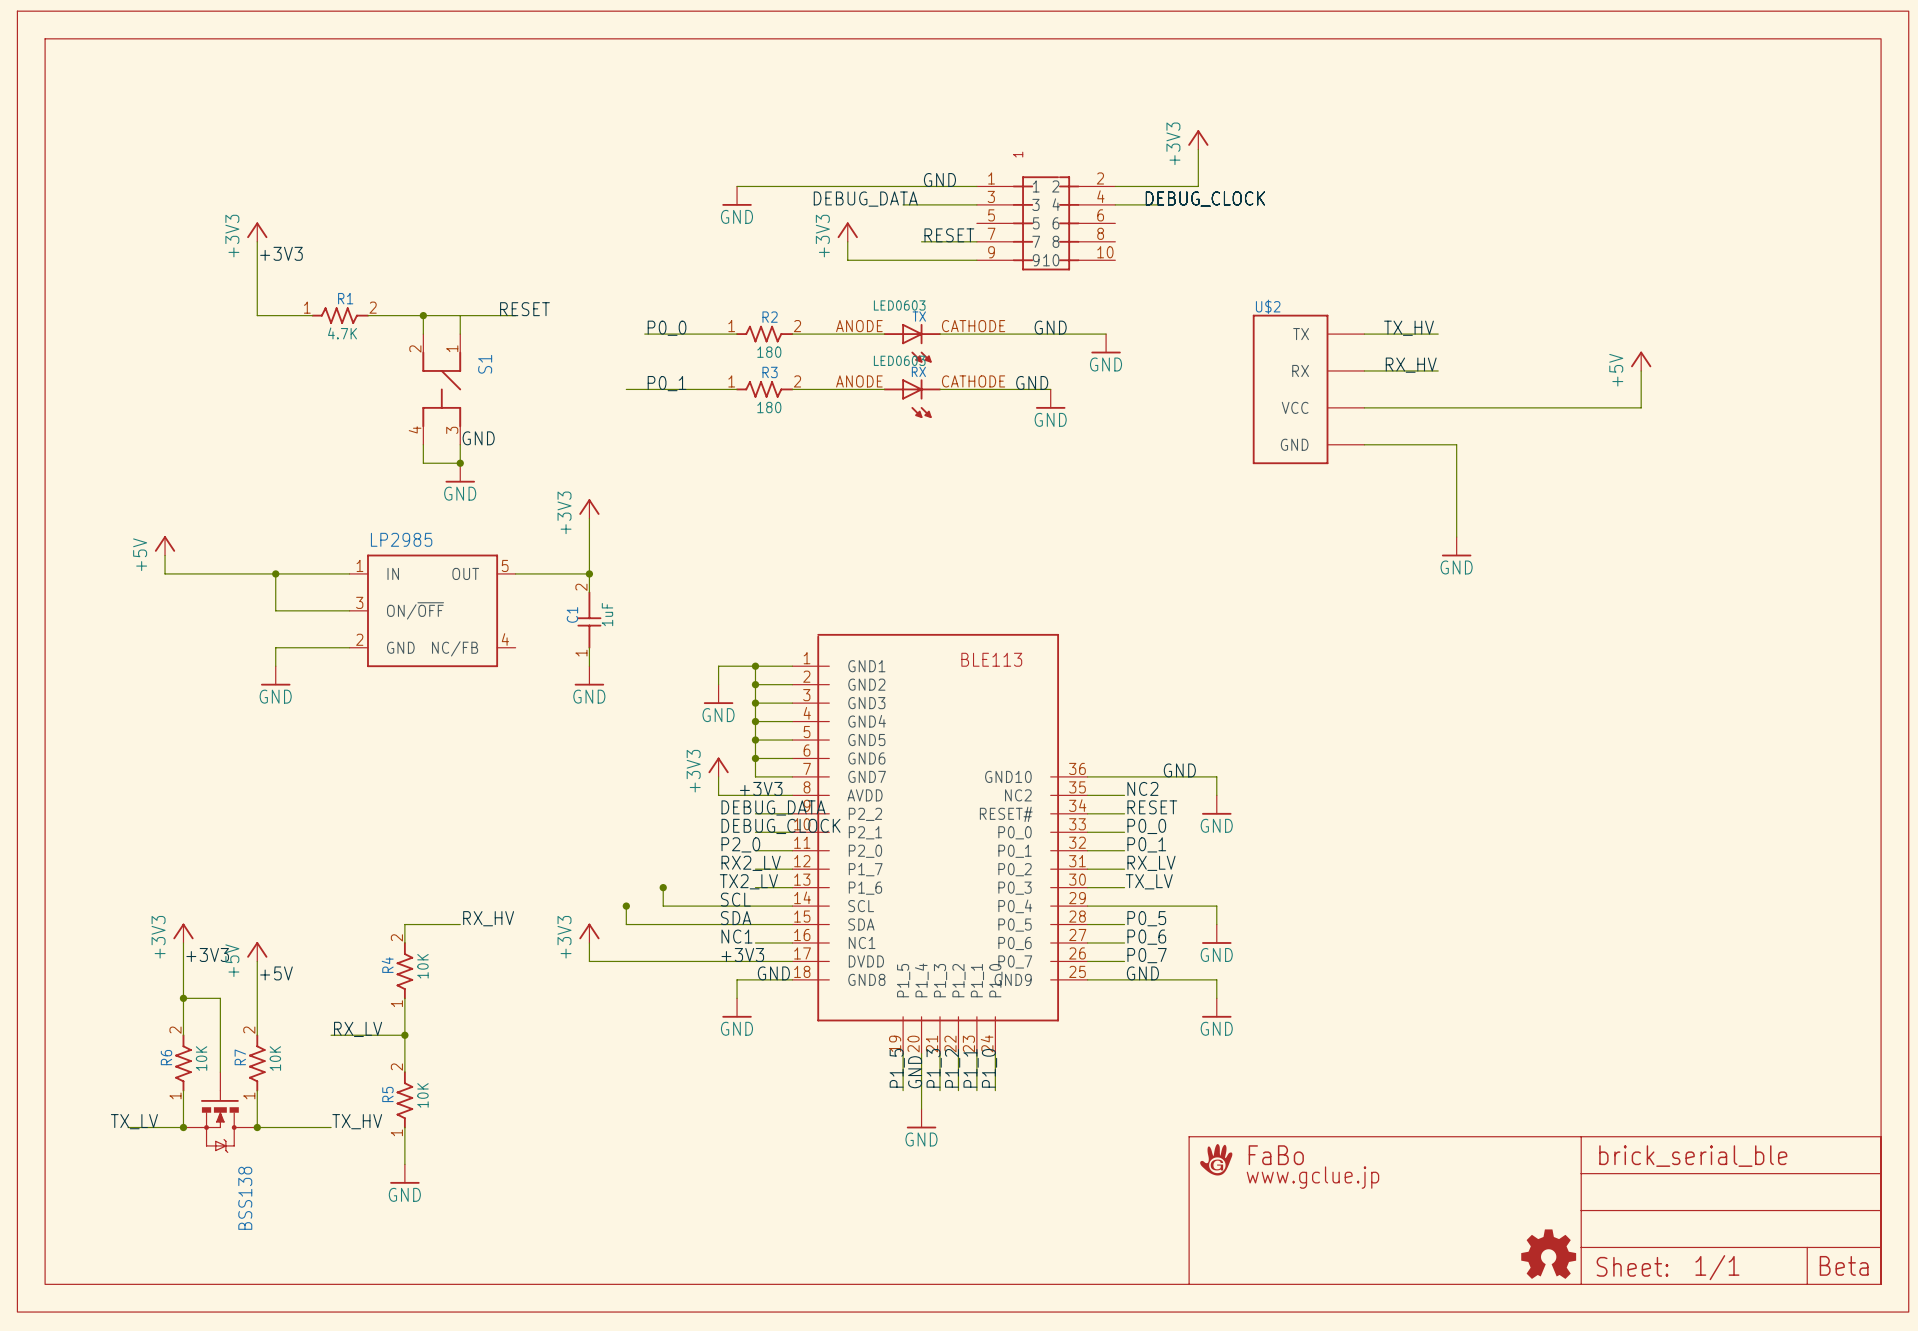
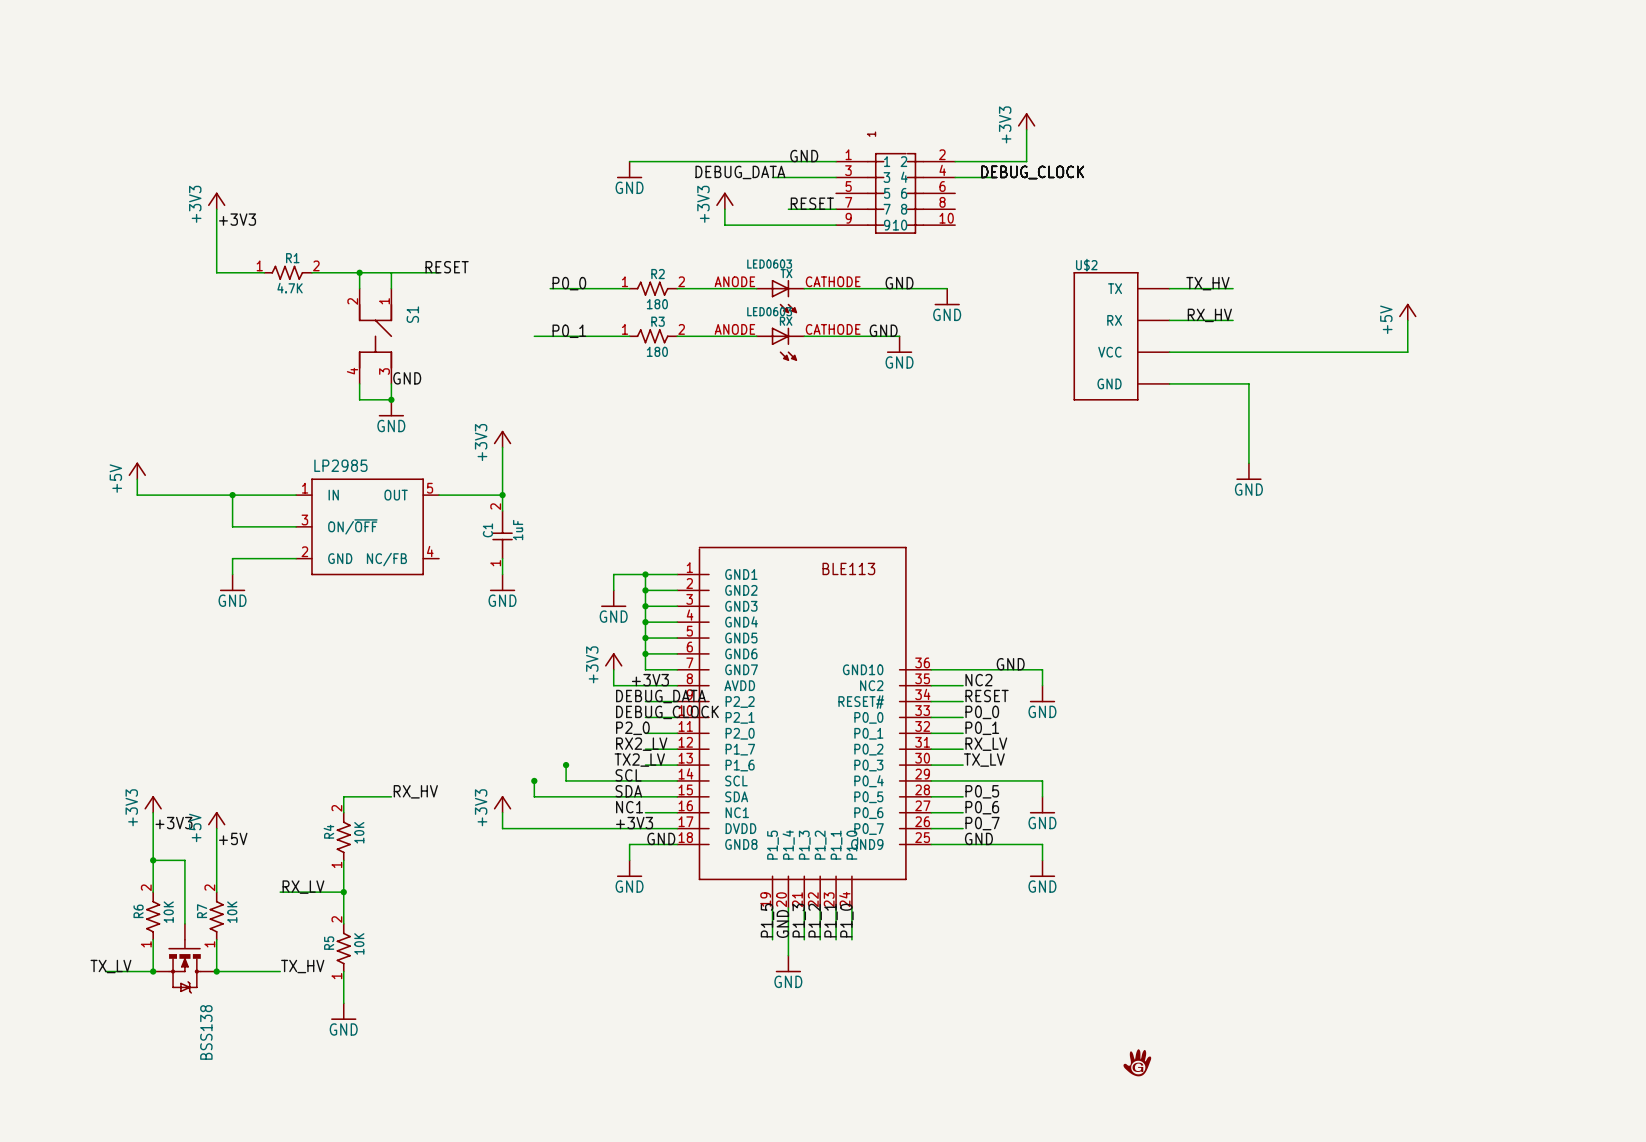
part: (963, 661) -> none
part: none -> (1137, 1062)
part: (1548, 1254) -> none
text: Beta (1844, 1265) -> none

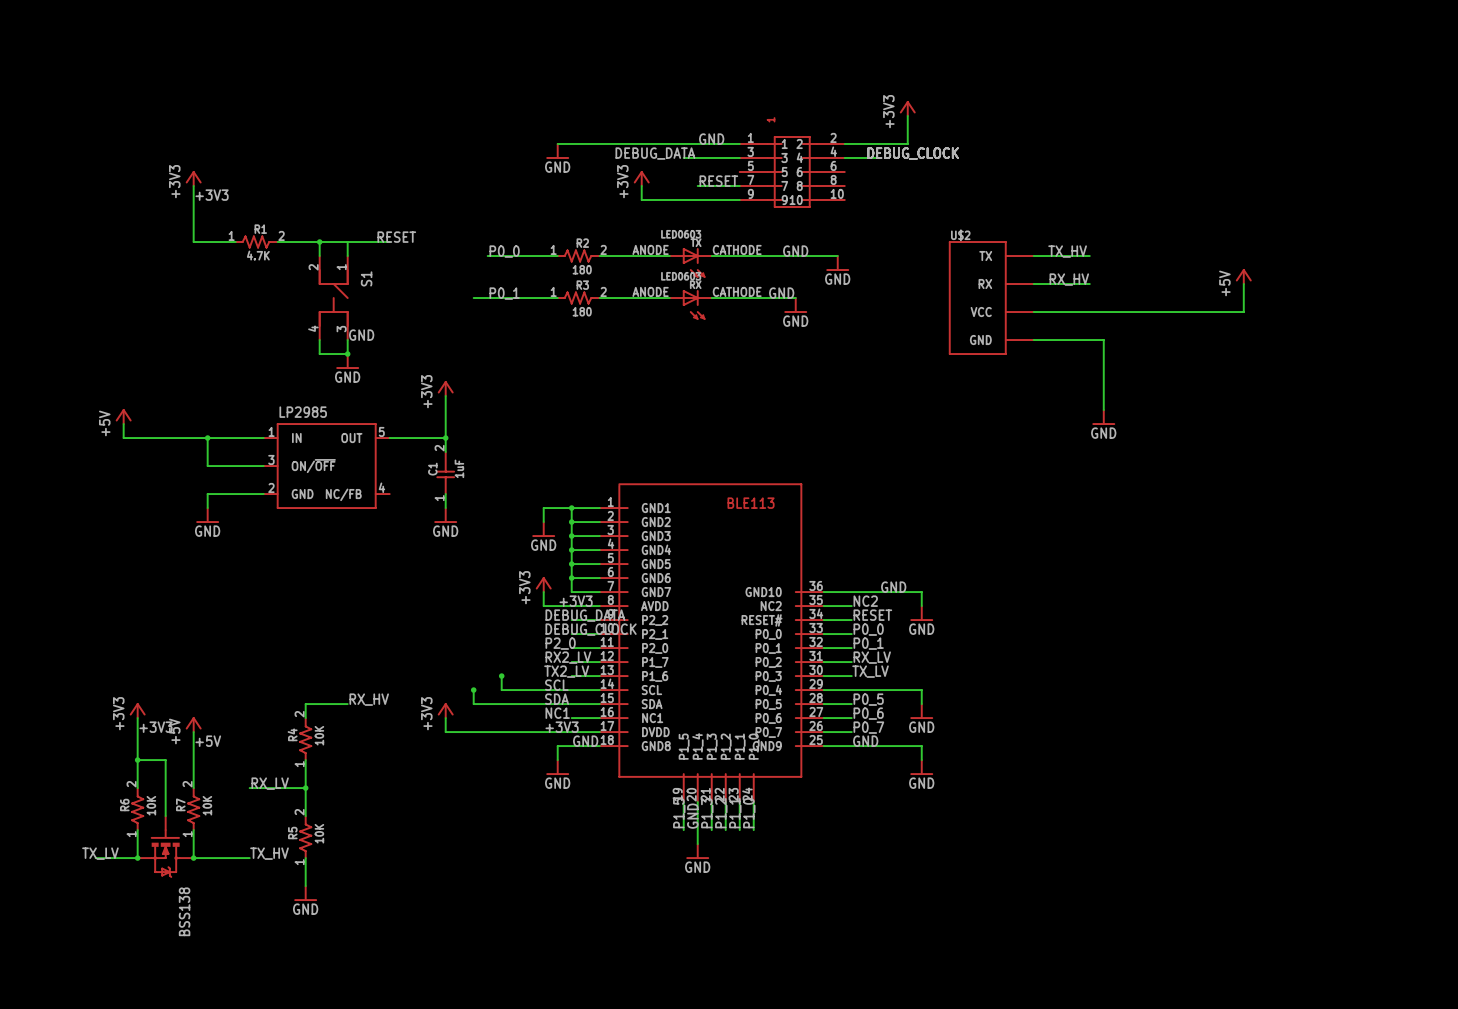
part: (1137, 1062) -> none

